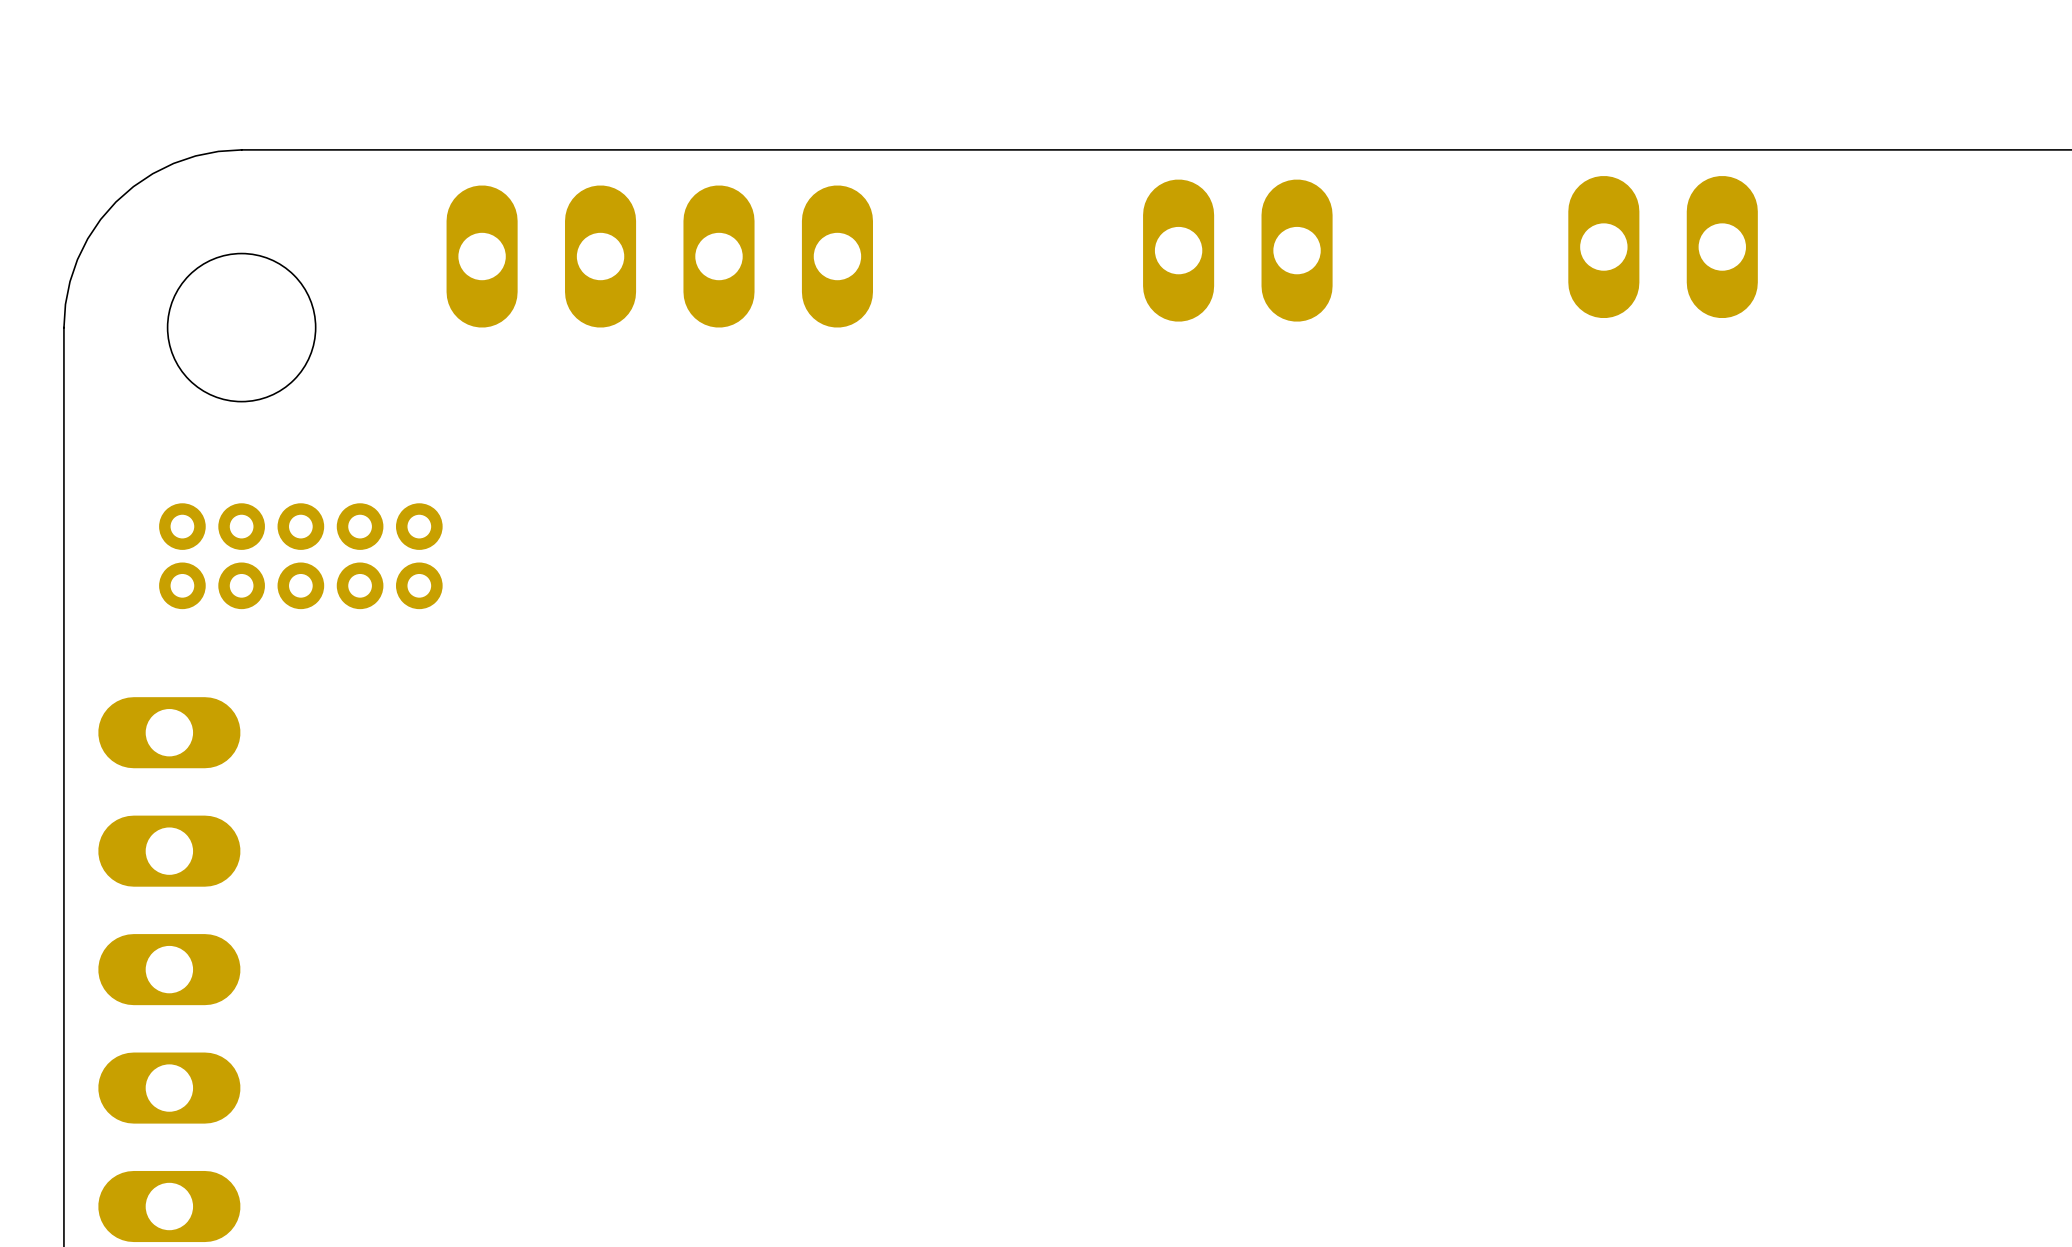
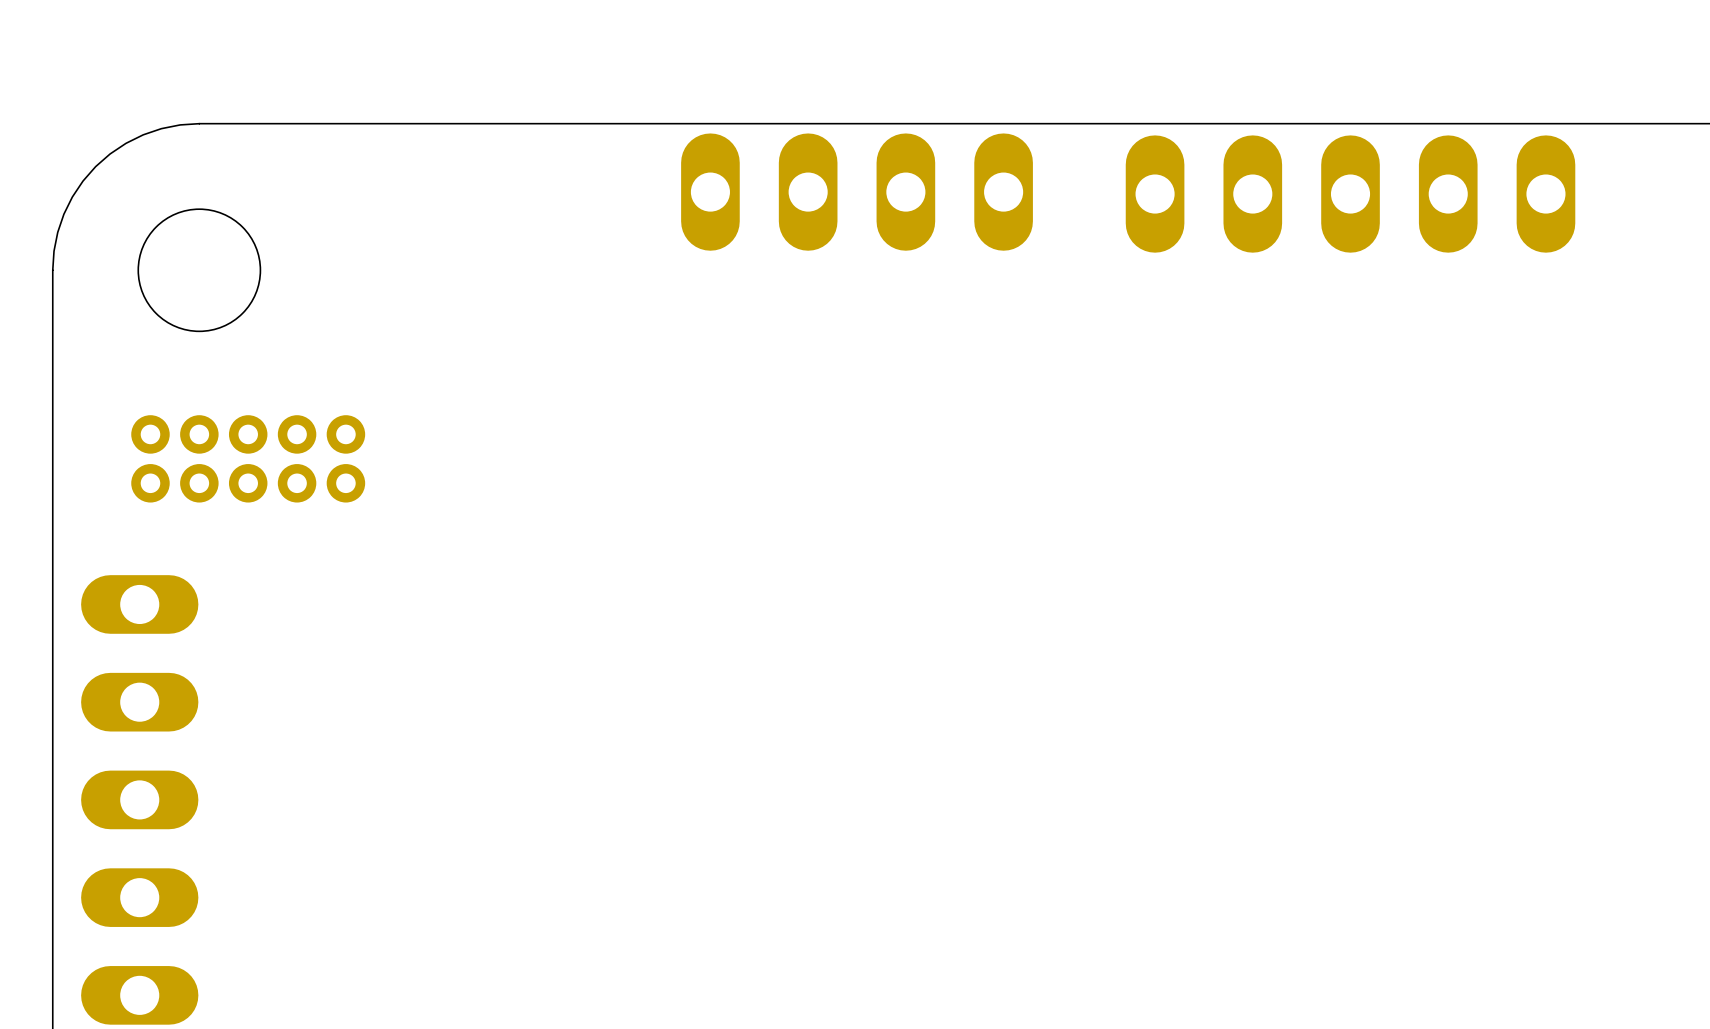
part footprint: [1568, 175, 1758, 319] -> [1125, 135, 1576, 253]
part: (1237, 250) -> none
part position: (659, 256) -> (857, 192)

